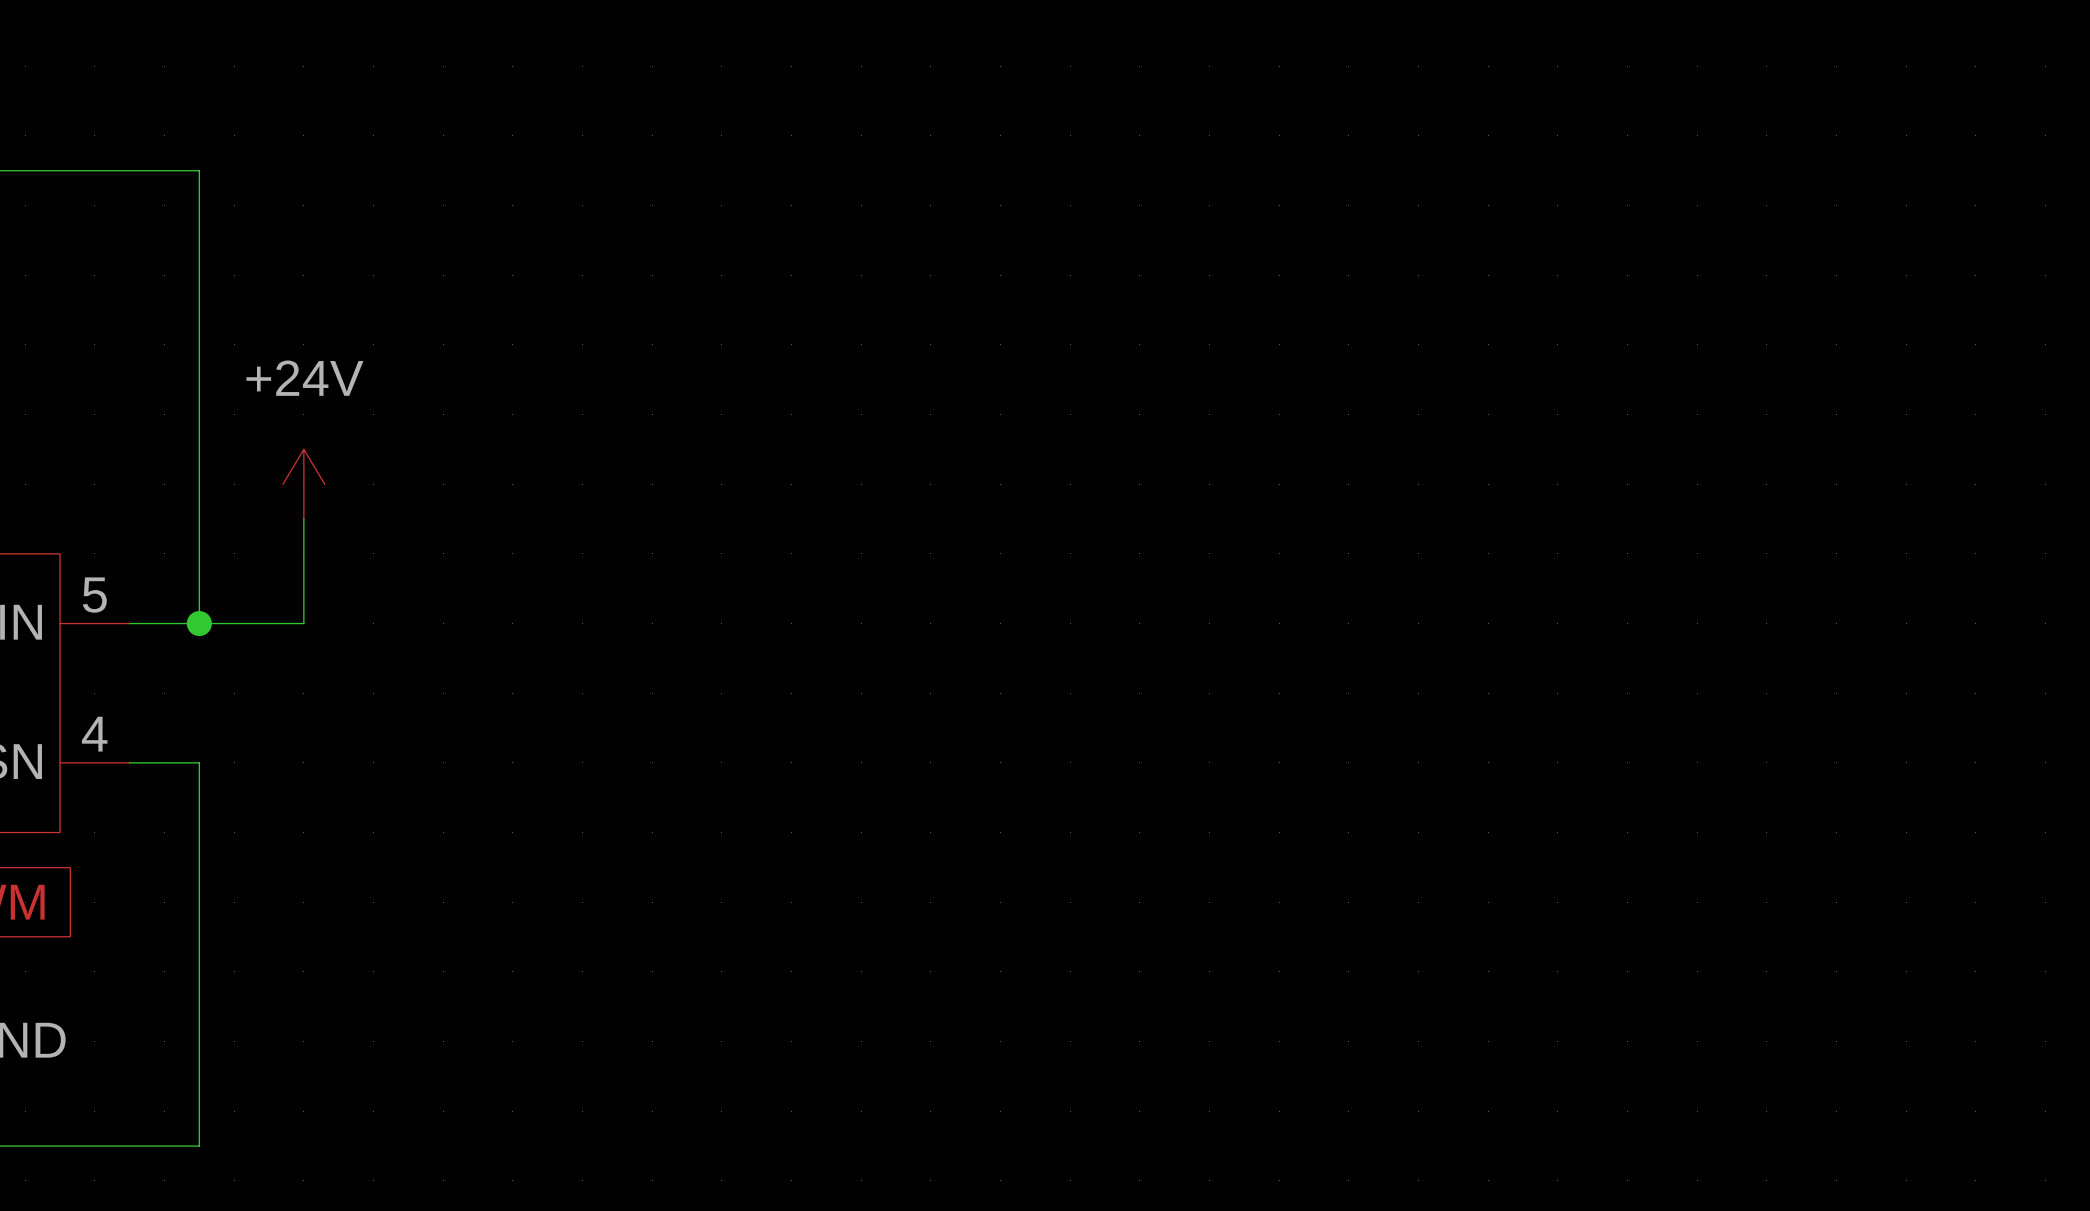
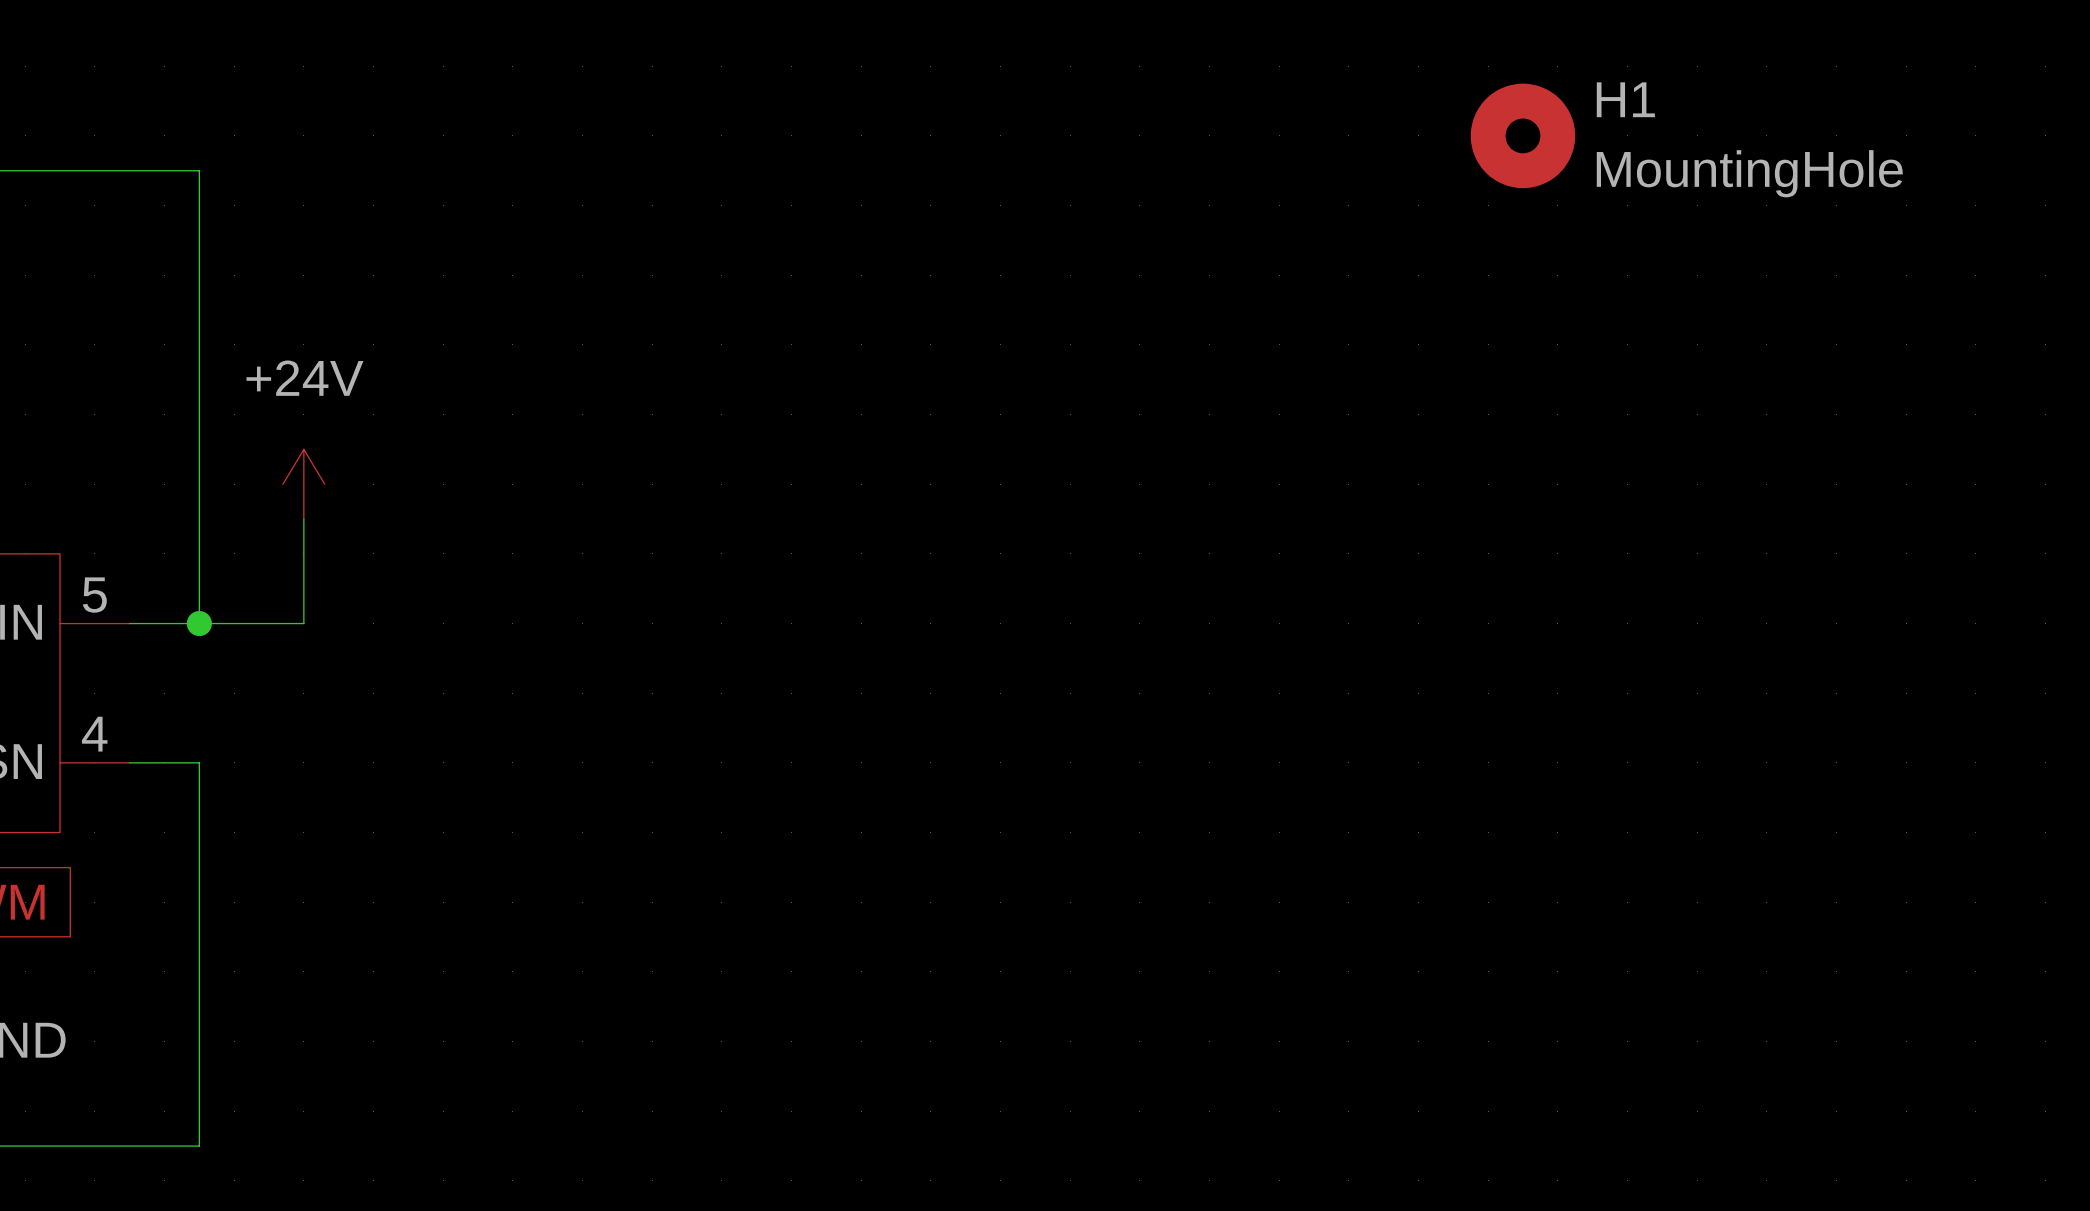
H1: none -> MountingHole (1522, 135)

